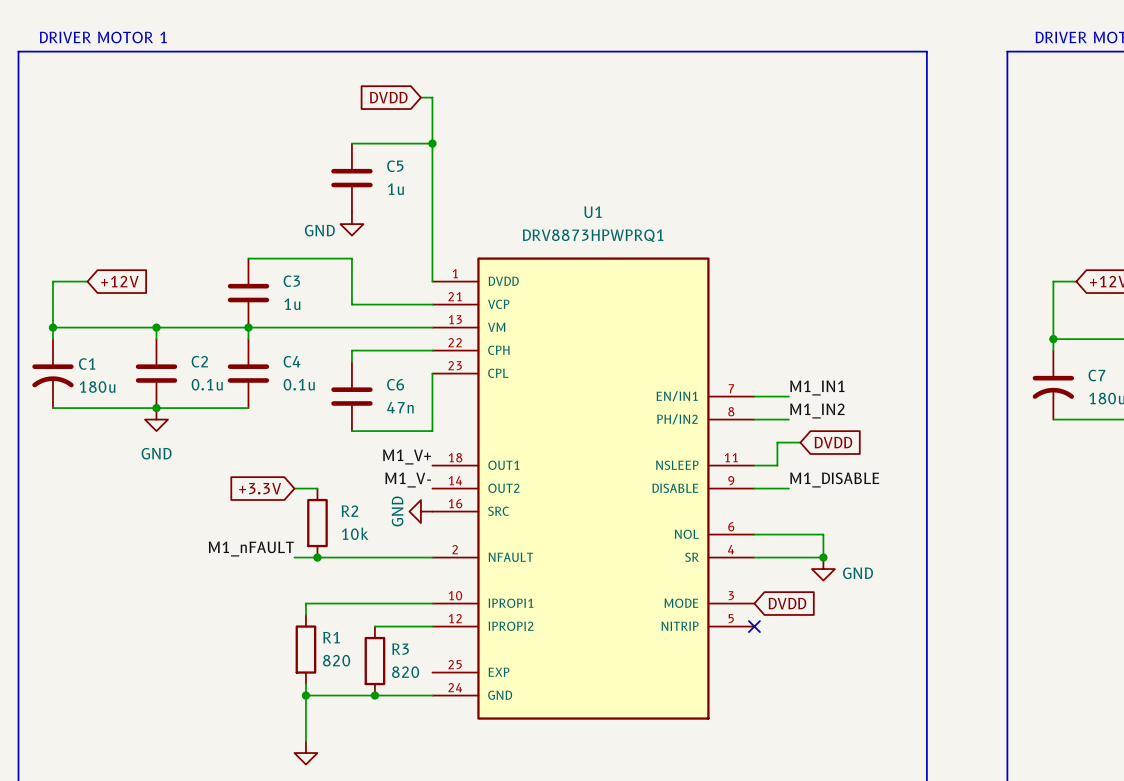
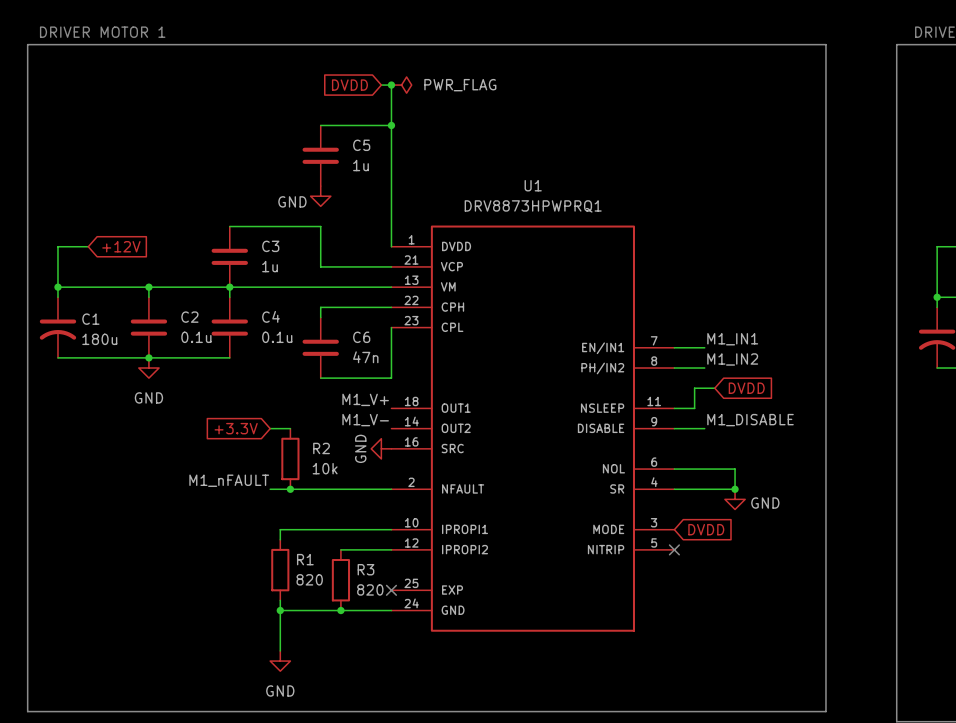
junction: none -> (391, 85)
power symbol: none -> PWR_FLAG (401, 85)
no-connect mark: none -> (391, 590)

